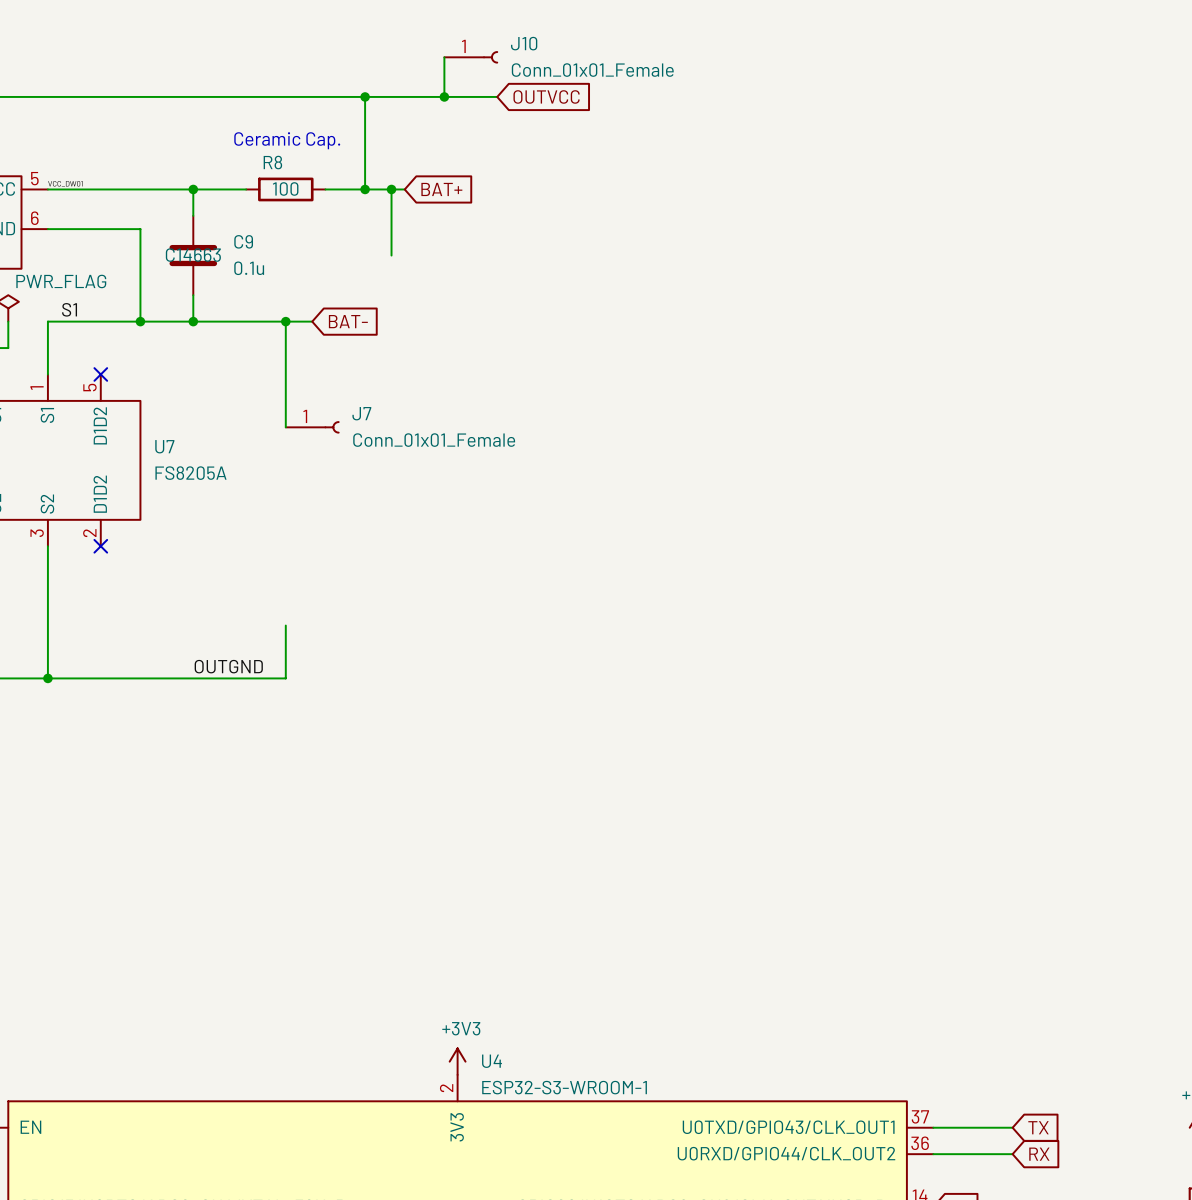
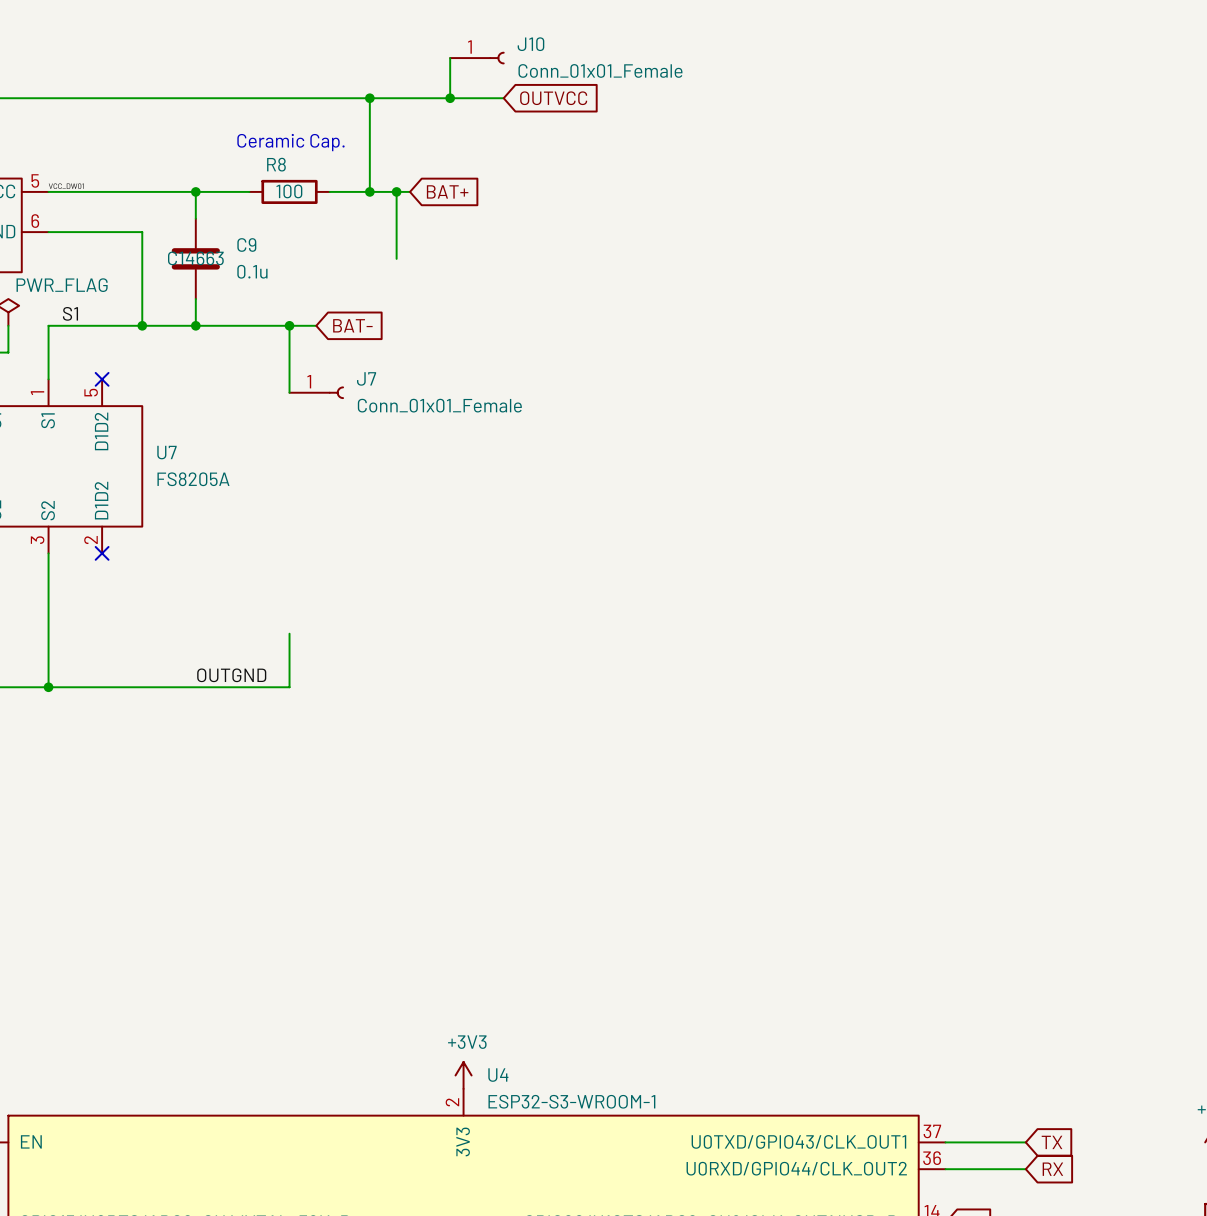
wire: (285, 387) (285, 427) -> none
J7 position: (312, 427) -> (316, 392)

